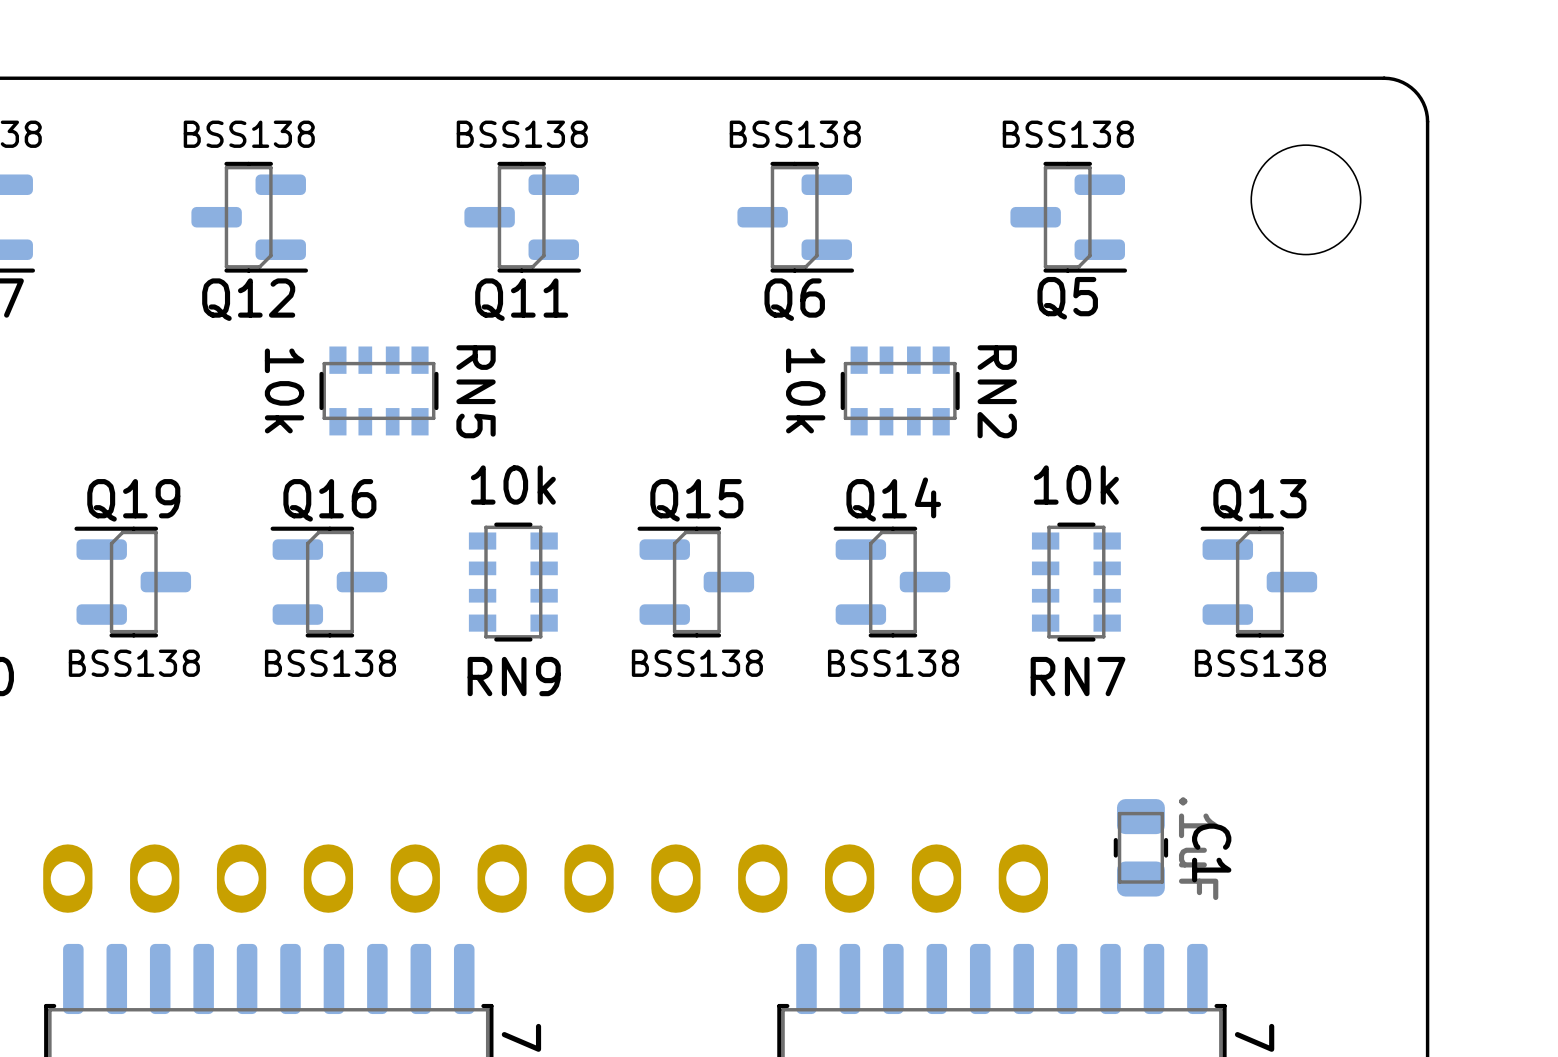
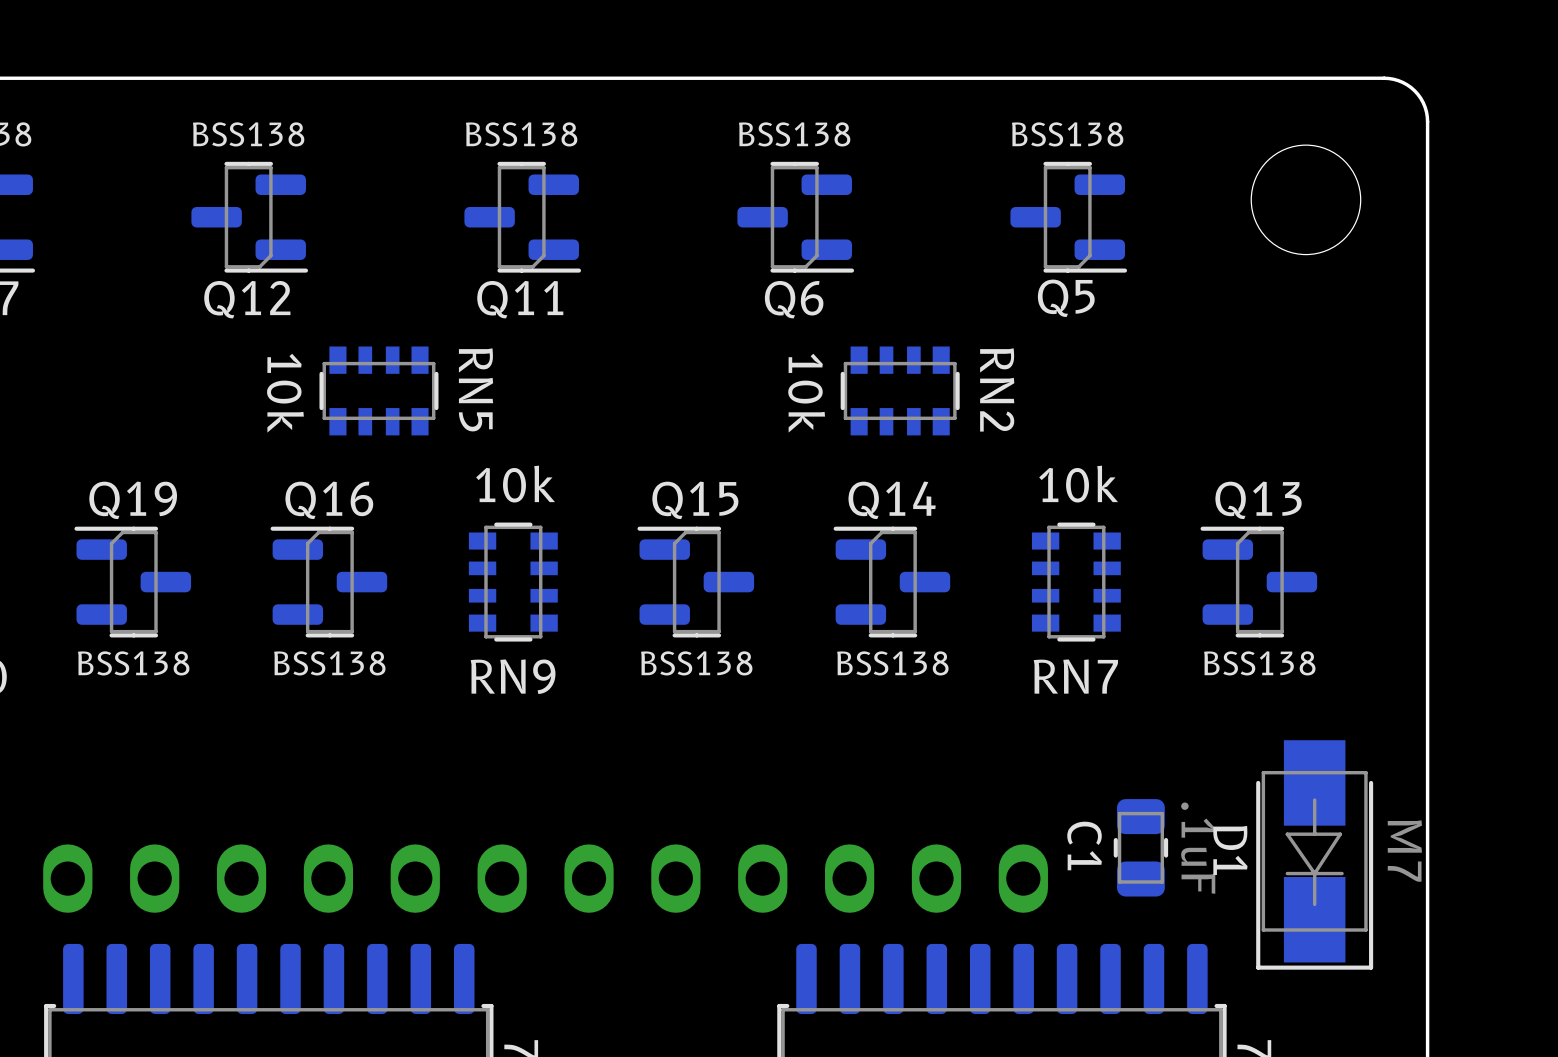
C1 name position: C1 (1211, 852) -> C1 (1084, 845)
D1: none -> M7 (1314, 854)

